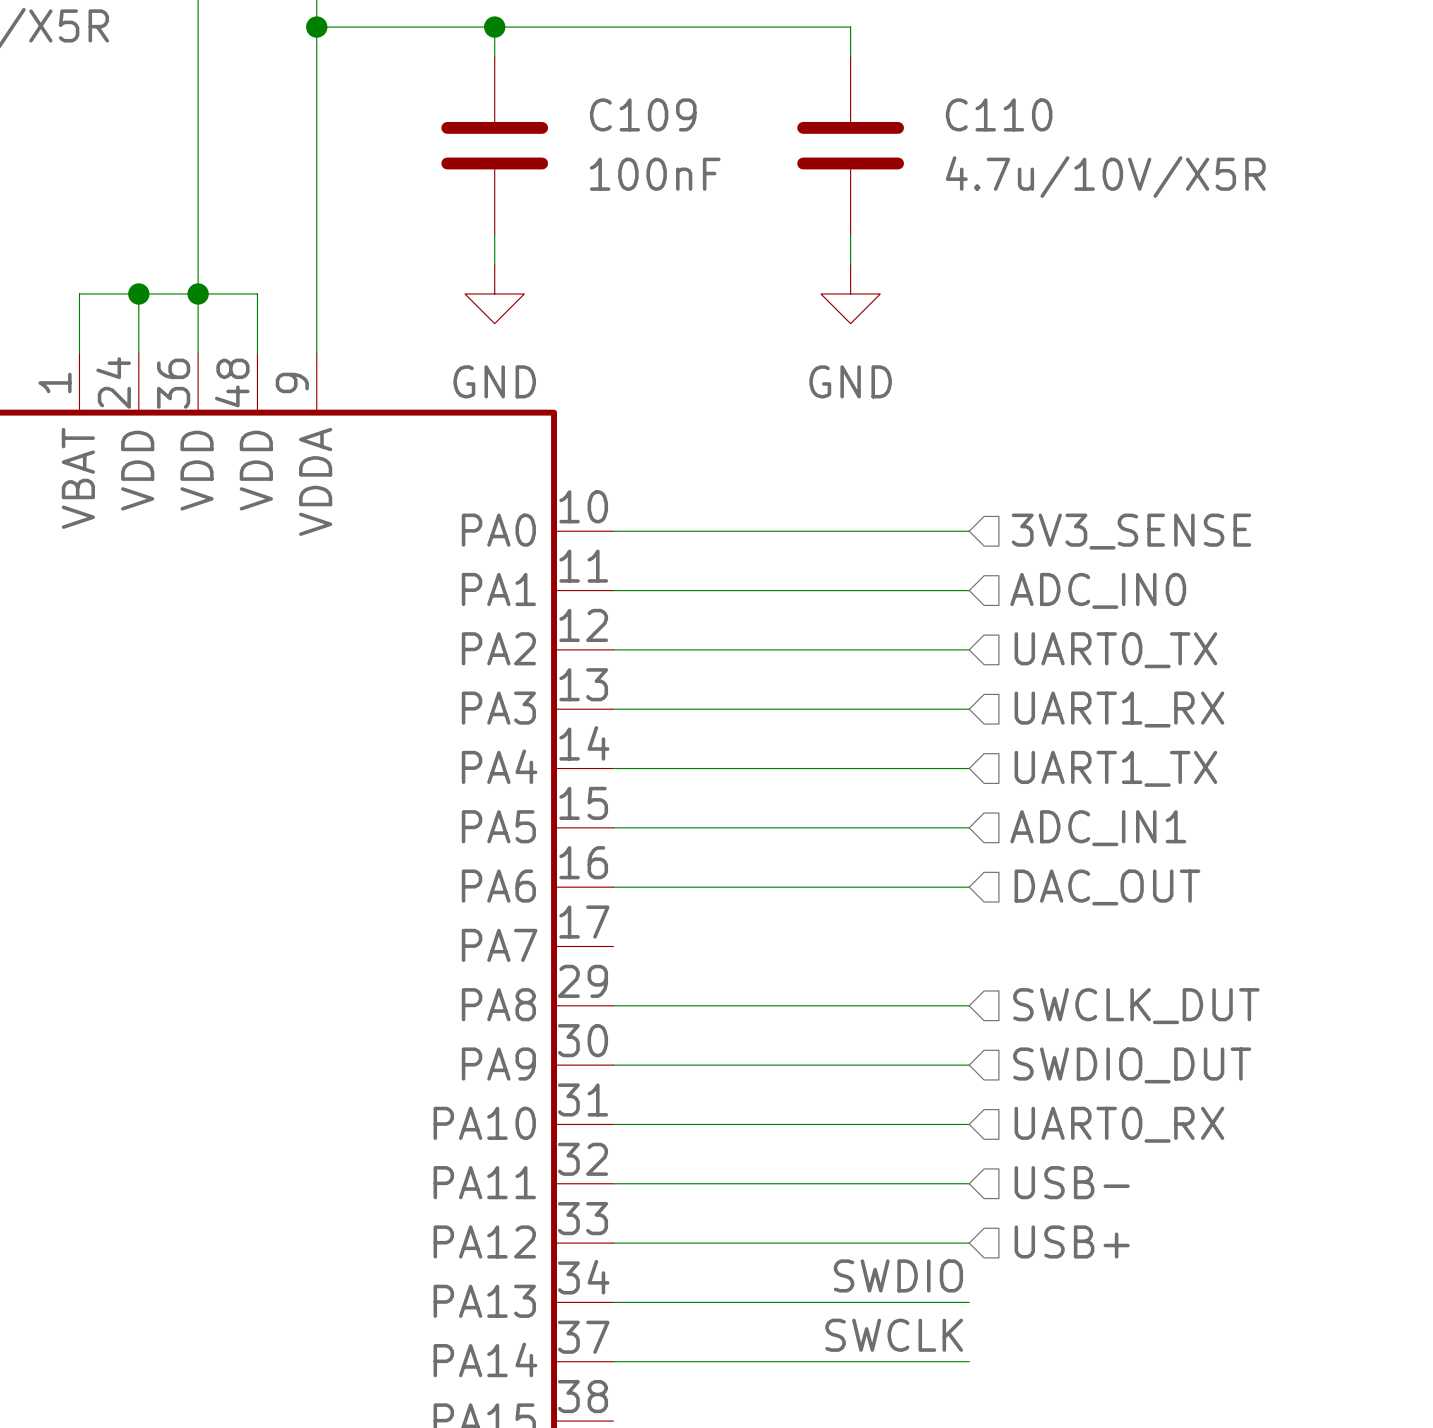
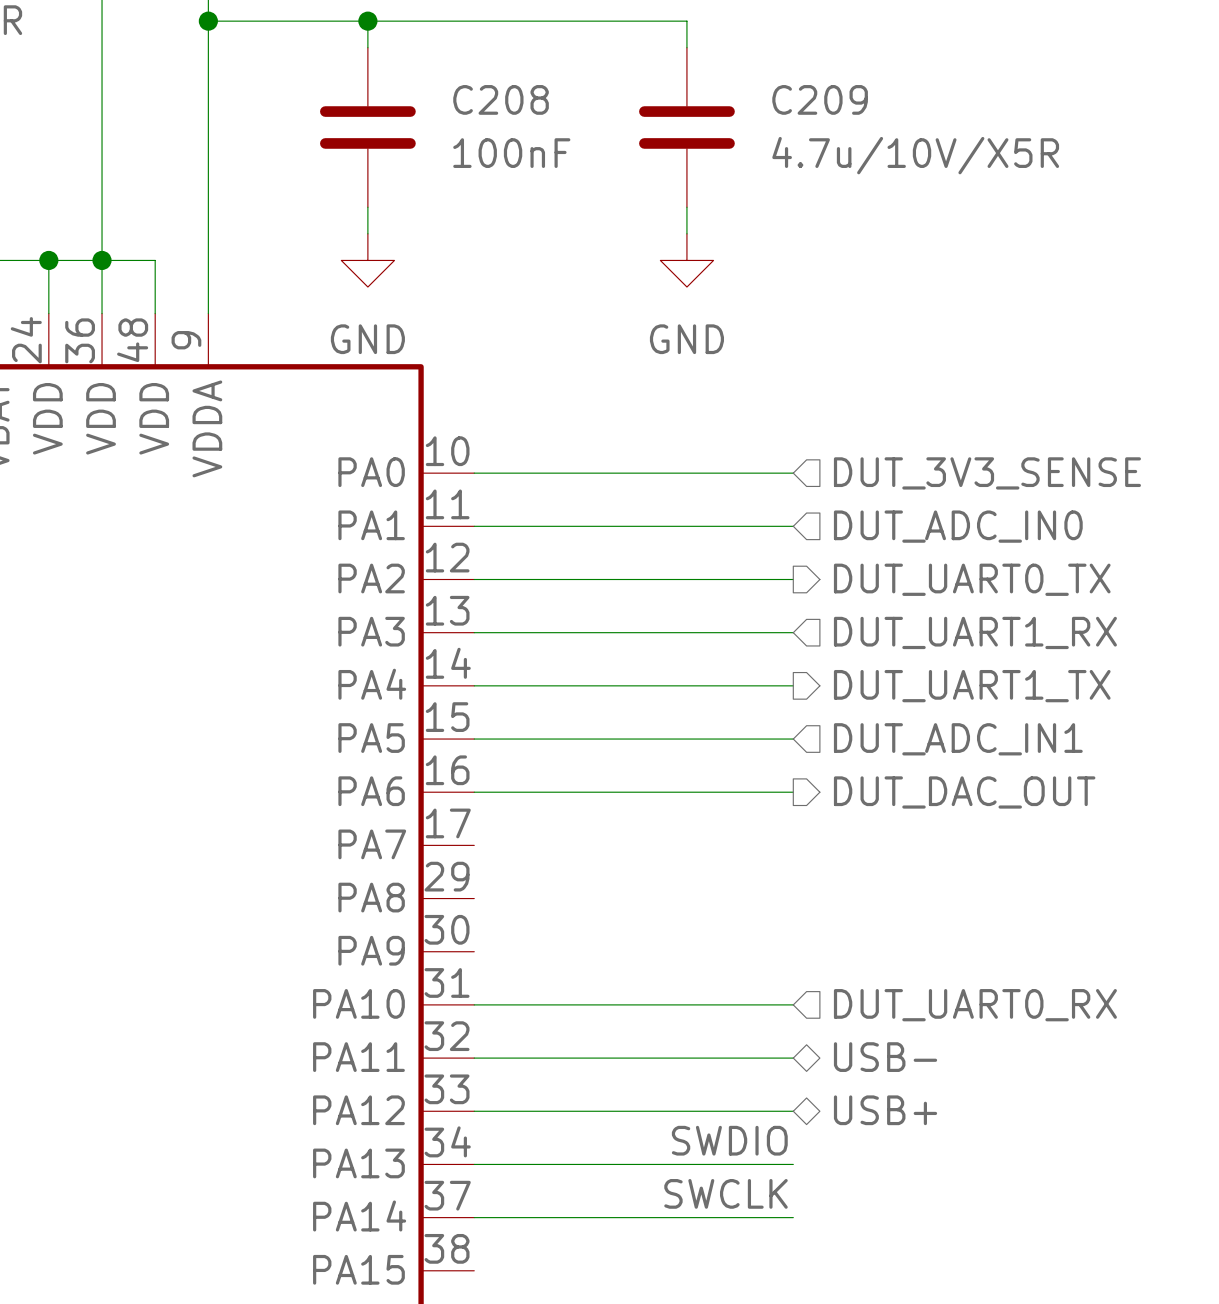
C109 name: C109 (643, 114) -> C208 (501, 99)
C110 name: C110 (999, 114) -> C209 (820, 99)
hierarchical label: 3V3_SENSE (1131, 531) -> DUT_3V3_SENSE (987, 473)
hierarchical label: ADC_IN0 (1098, 590) -> DUT_ADC_IN0 (958, 526)
hierarchical label shape: input (1115, 650) -> output (972, 579)
hierarchical label: UART0_TX (1115, 650) -> DUT_UART0_TX (972, 579)
hierarchical label: UART1_RX (1119, 709) -> DUT_UART1_RX (975, 632)
hierarchical label shape: input (1115, 768) -> output (972, 686)
hierarchical label: UART1_TX (1115, 768) -> DUT_UART1_TX (972, 686)
hierarchical label: ADC_IN1 (1098, 828) -> DUT_ADC_IN1 (958, 739)
hierarchical label shape: input (1107, 887) -> output (964, 792)
hierarchical label: DAC_OUT (1107, 887) -> DUT_DAC_OUT (964, 792)
wire: (613, 1005) (969, 1005) -> none
hierarchical label: SWCLK_DUT (1136, 1006) -> none
wire: (613, 1065) (969, 1065) -> none
hierarchical label: SWDIO_DUT (1132, 1065) -> none
hierarchical label: UART0_RX (1119, 1124) -> DUT_UART0_RX (975, 1005)
hierarchical label shape: input (1072, 1182) -> bidirectional (885, 1057)
hierarchical label shape: input (1072, 1241) -> bidirectional (885, 1110)

